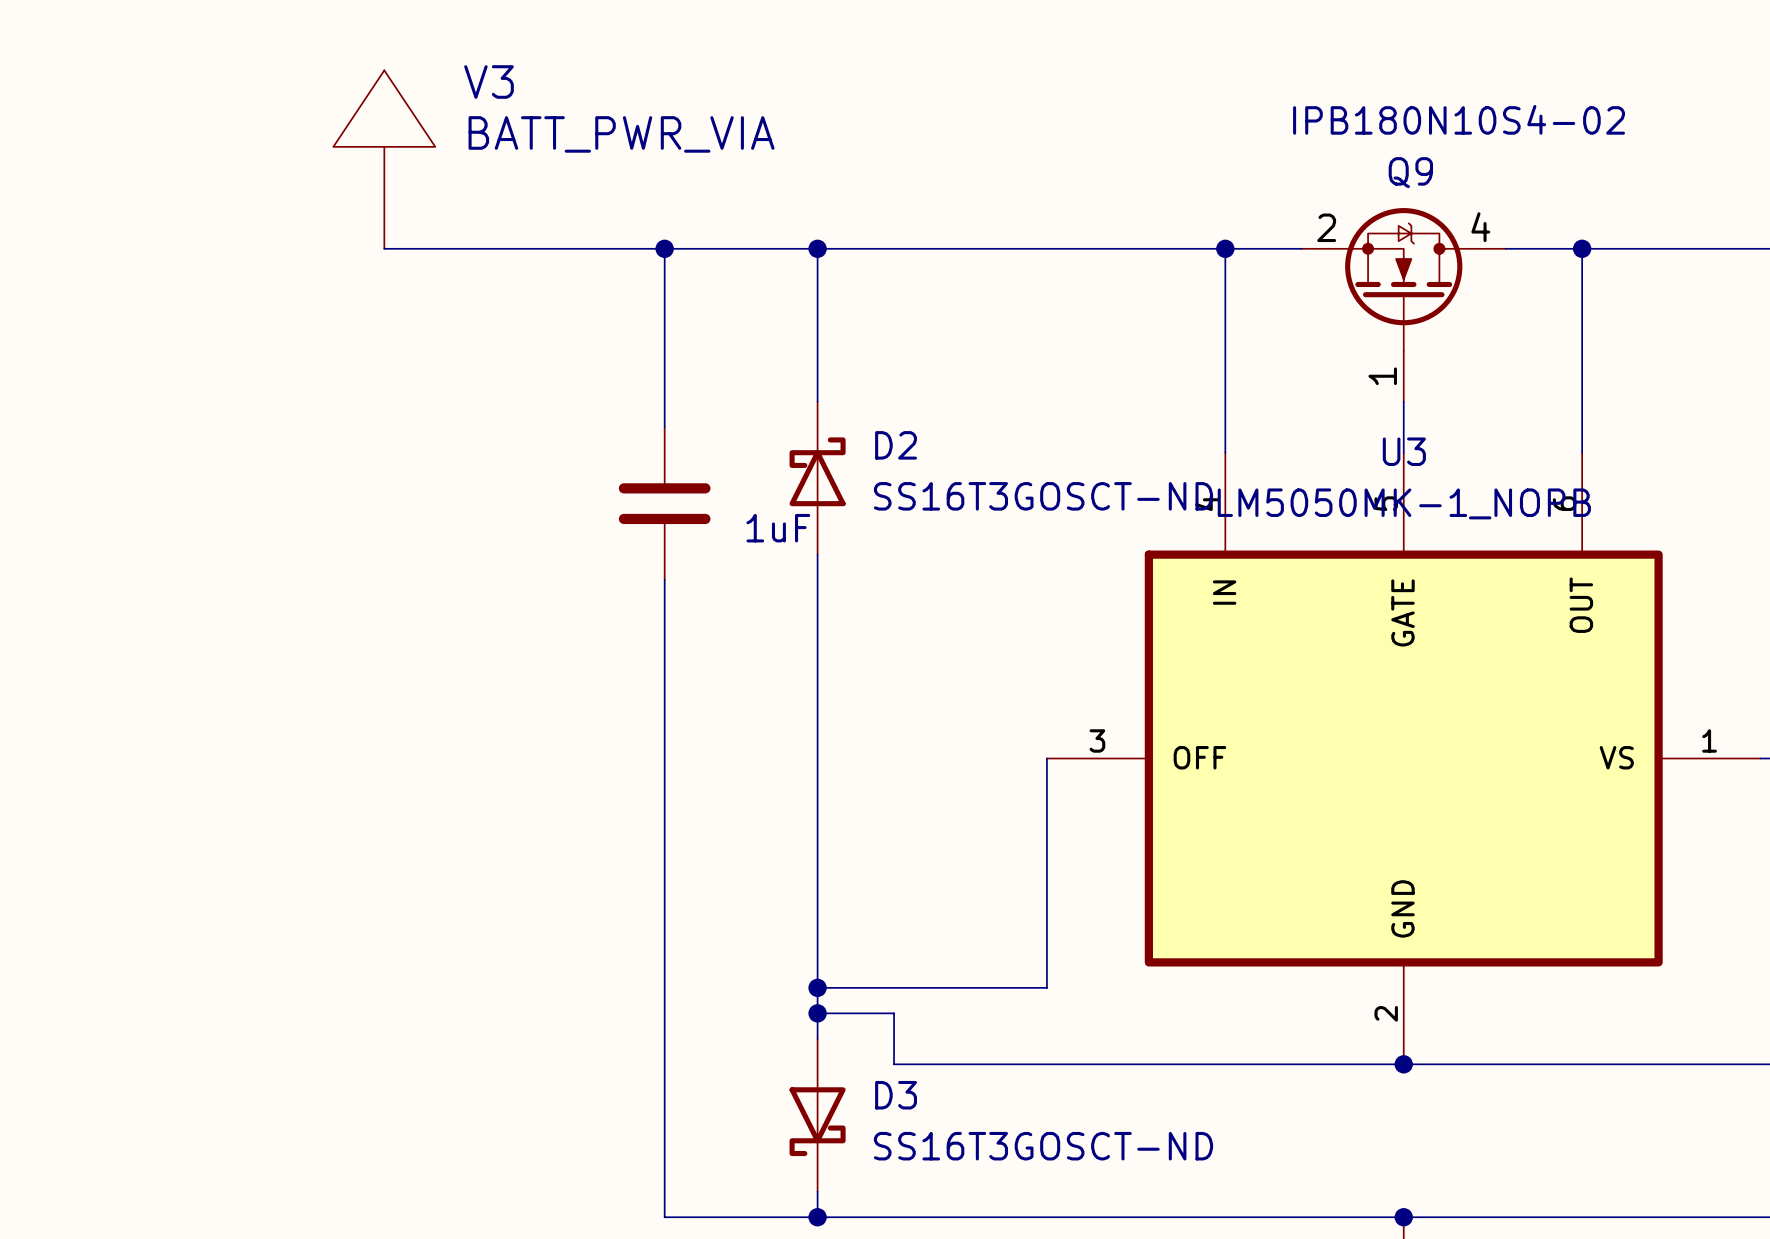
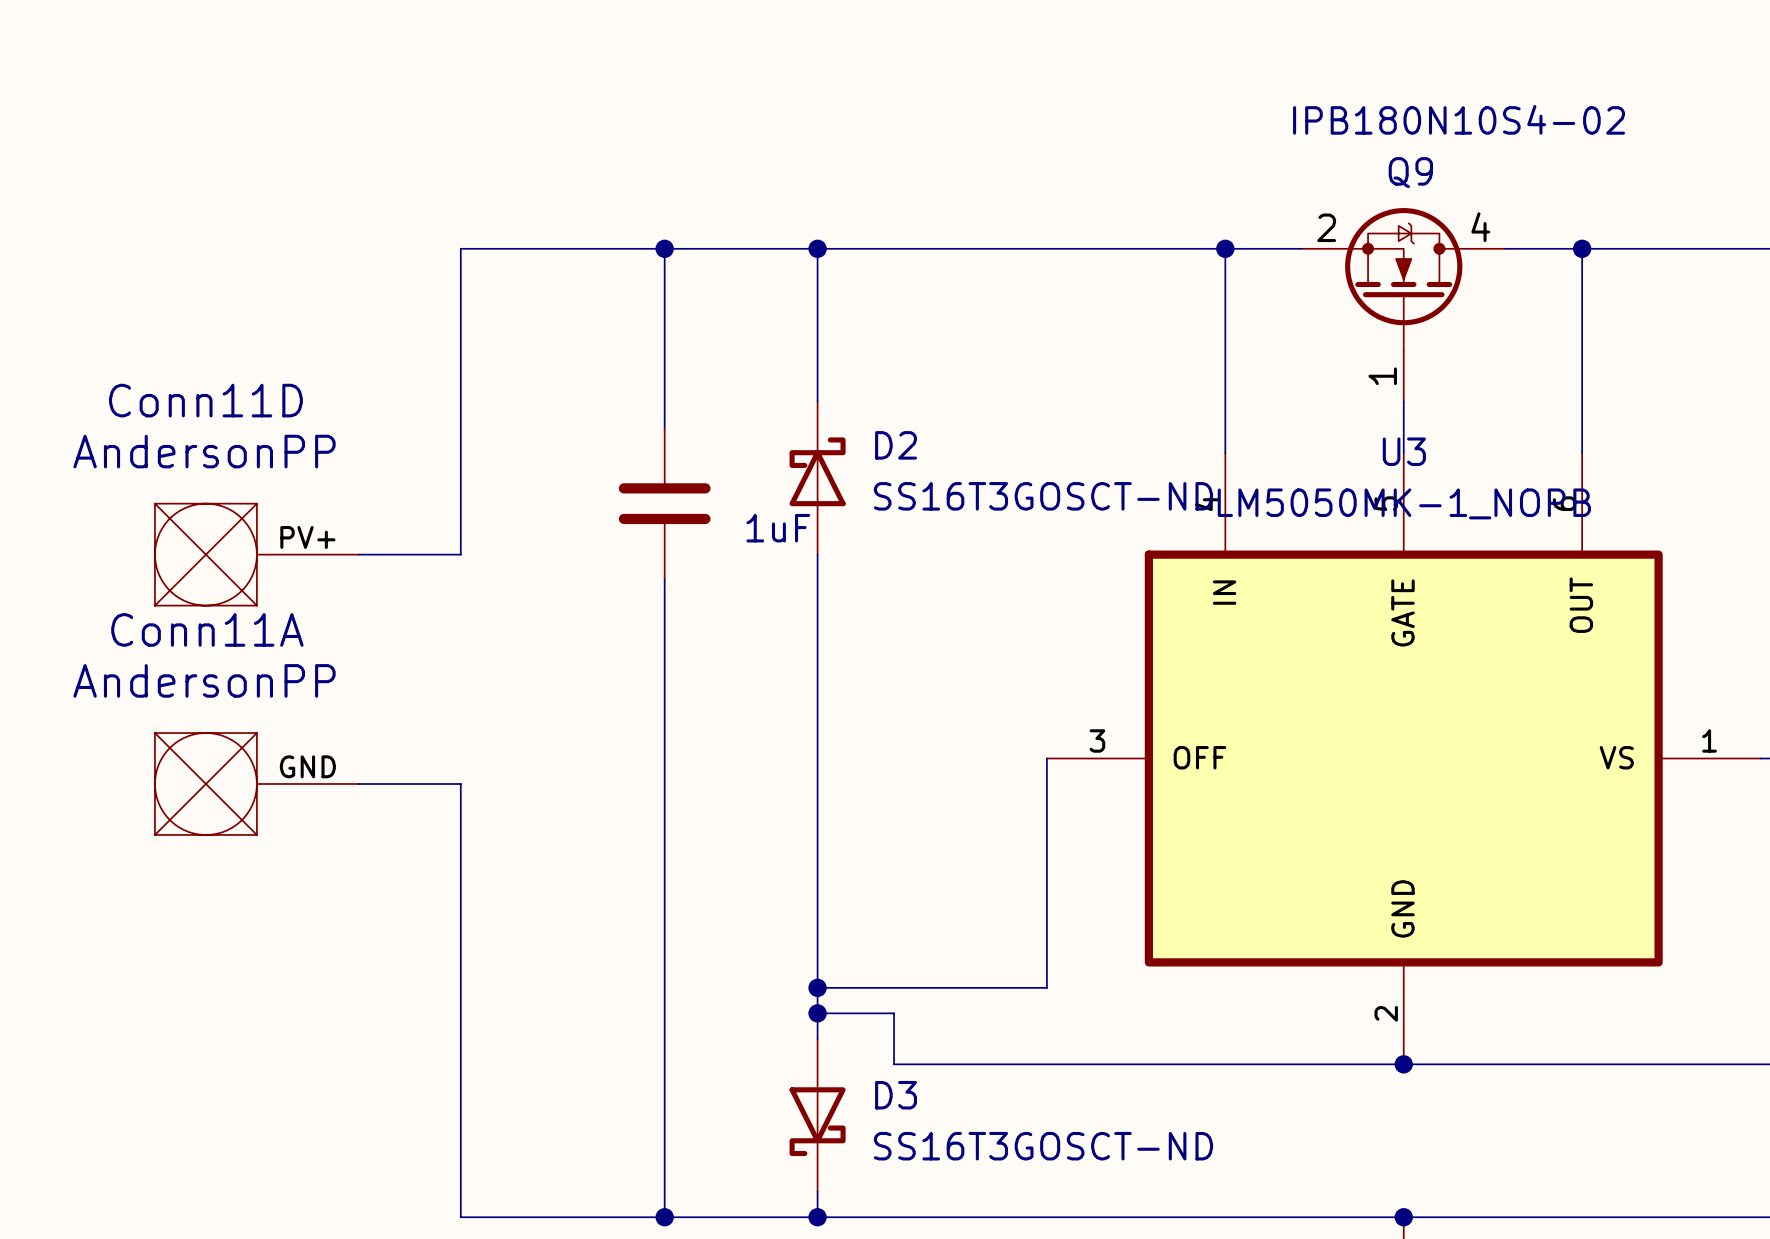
V3: BATT_PWR_VIA (384, 159) -> none
wire: (384, 248) (460, 248) -> (358, 554) (460, 554) (460, 248)
Conn11D: none -> AndersonPP (256, 554)
Conn11A: none -> AndersonPP (256, 783)
wire: none -> (358, 783) (460, 783) (460, 1217) (664, 1217)
junction: none -> (664, 1217)

